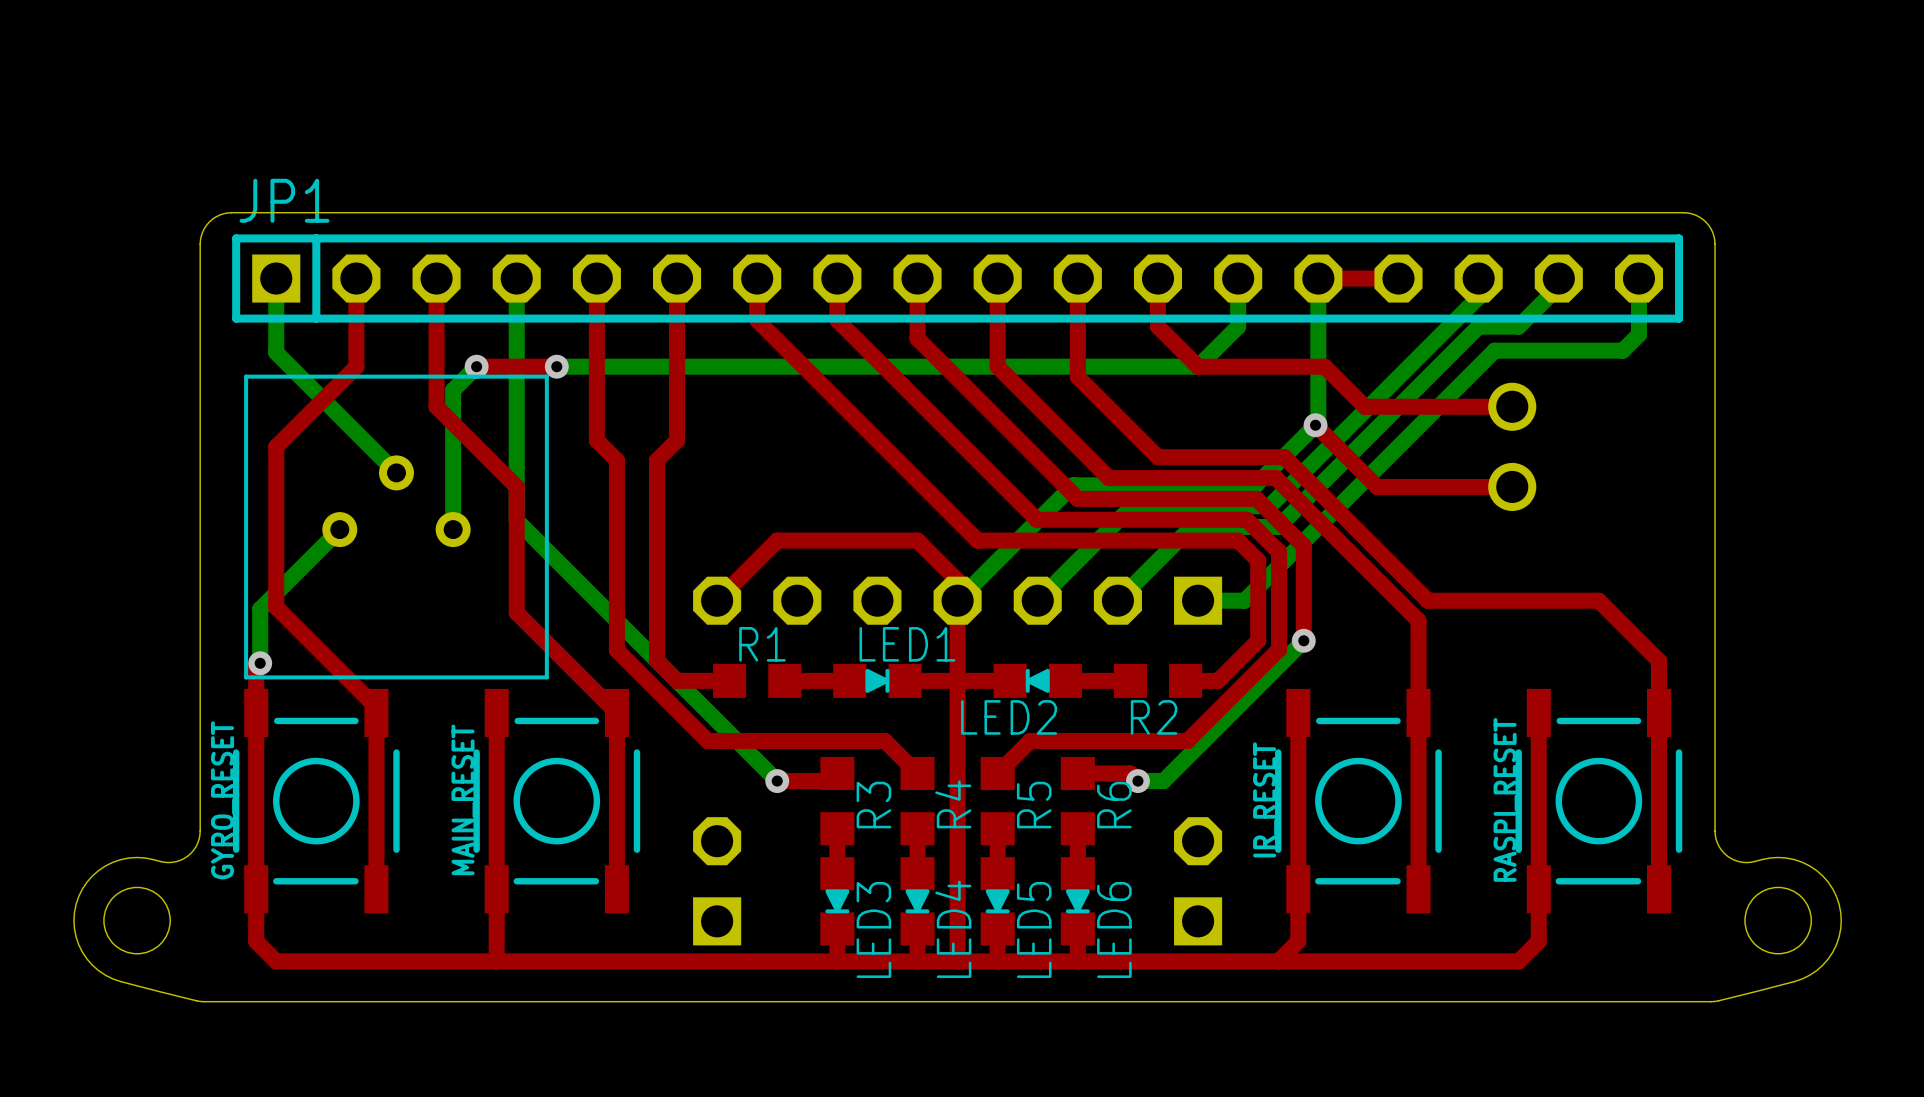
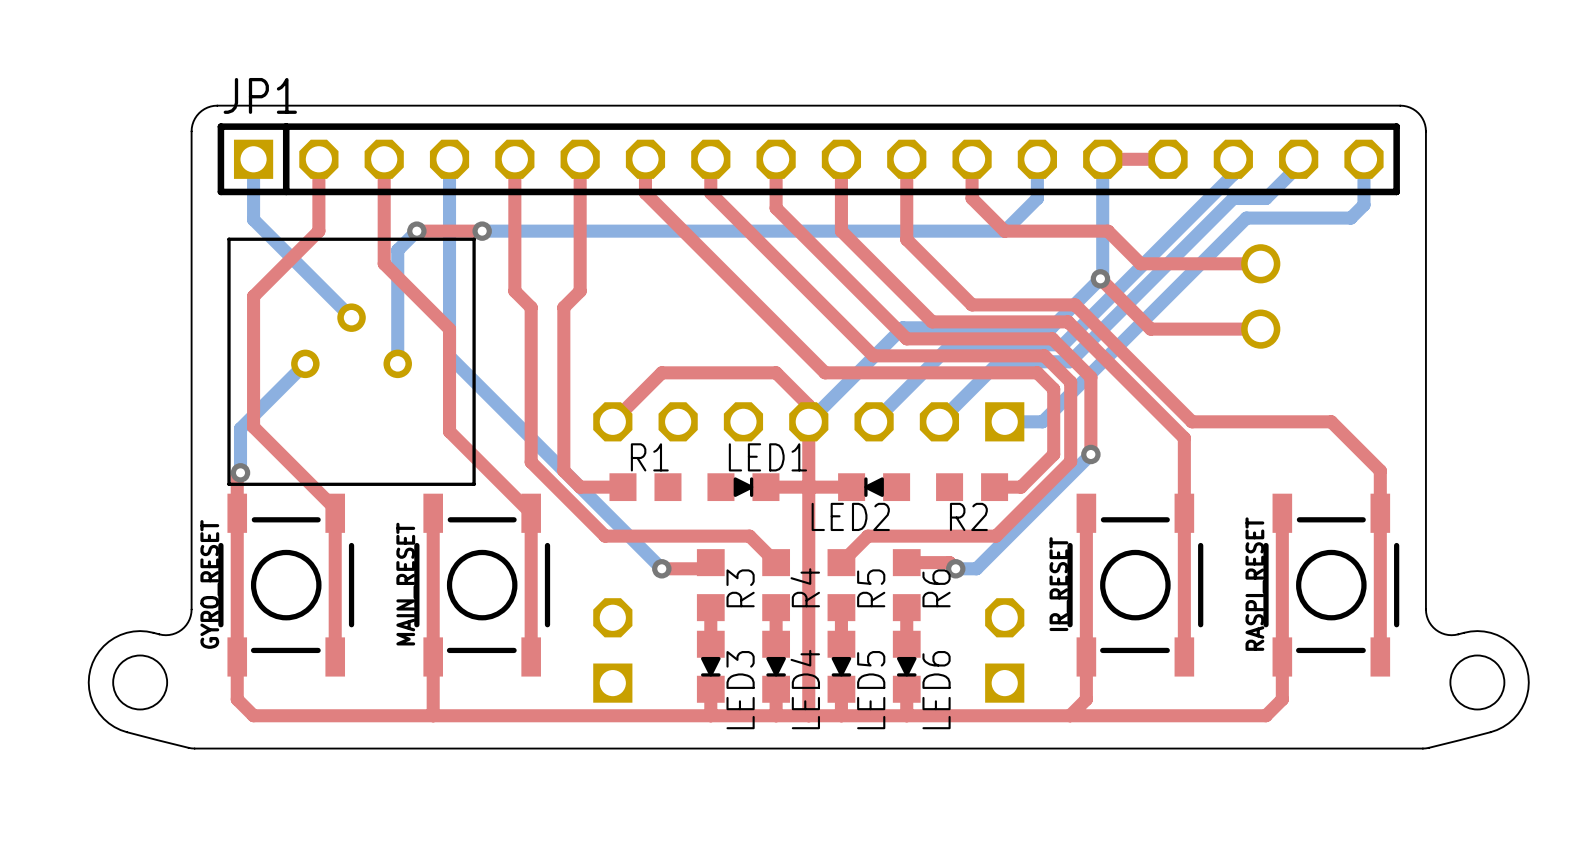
top track: (784, 680) (849, 680) -> none
top track: (1065, 680) (1130, 680) -> none

